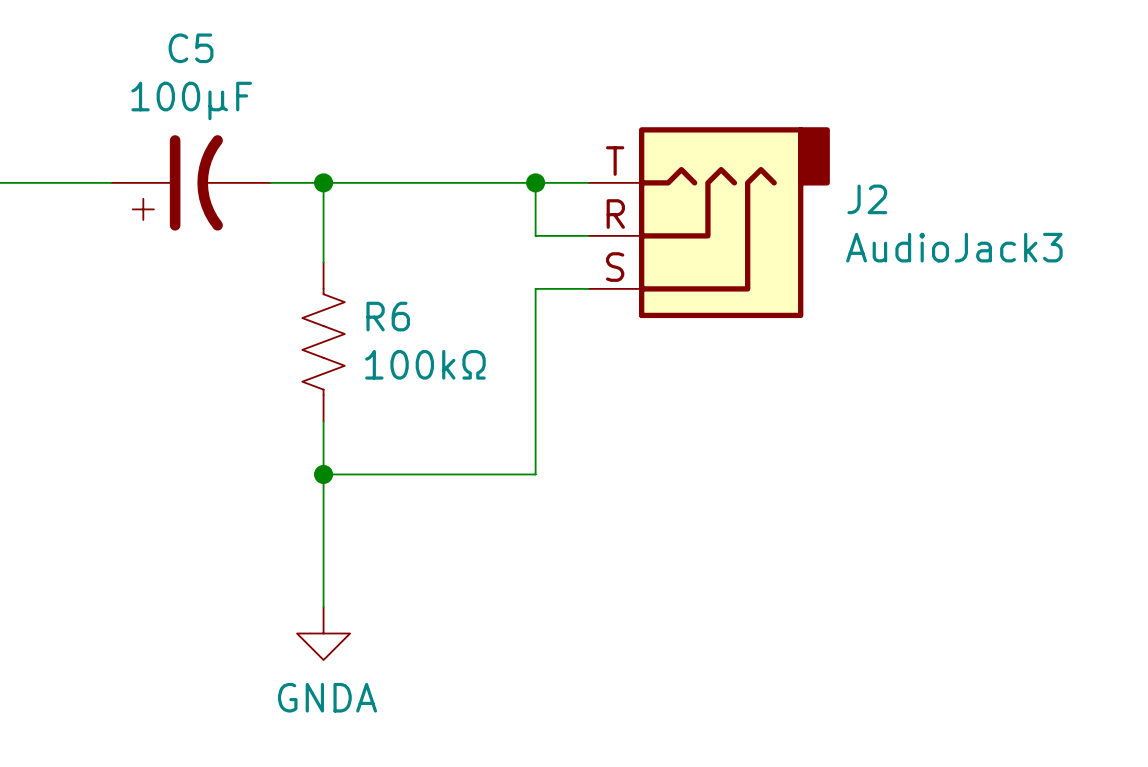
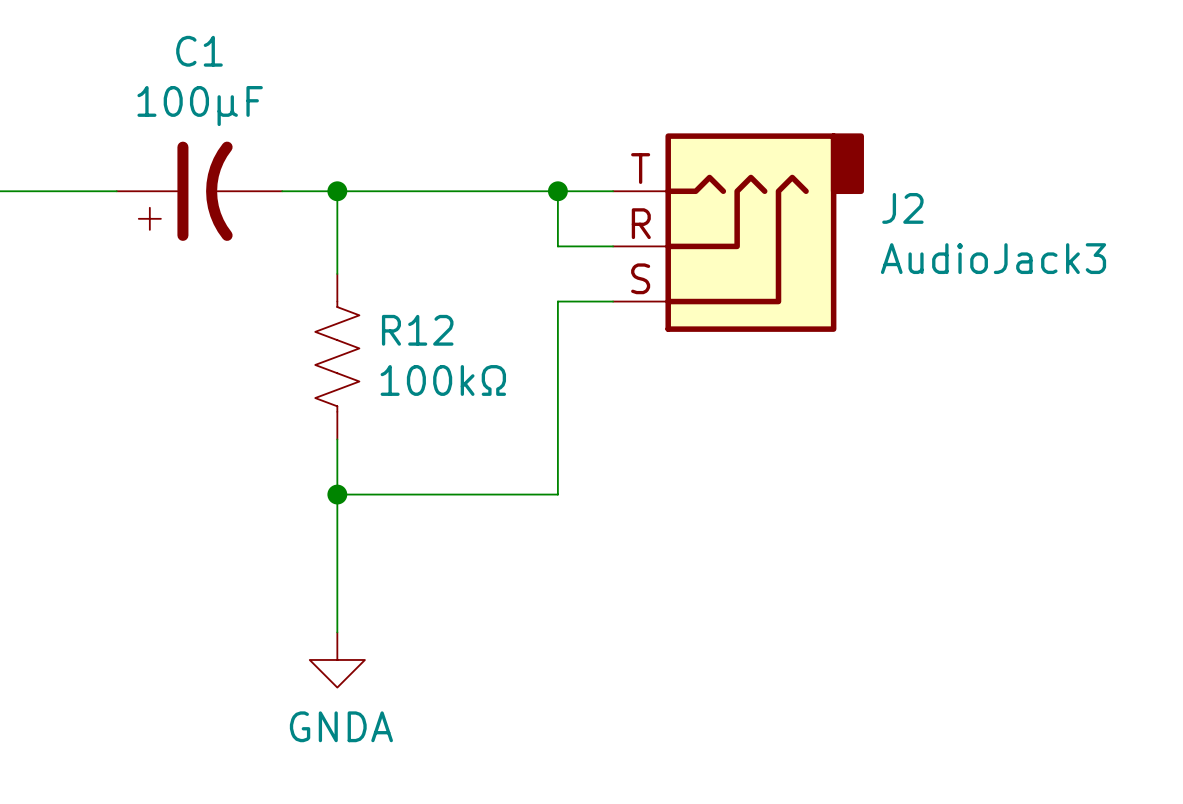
C5 name: C5 (191, 48) -> C1 (199, 51)
R6 name: R6 (388, 316) -> R12 (417, 330)

